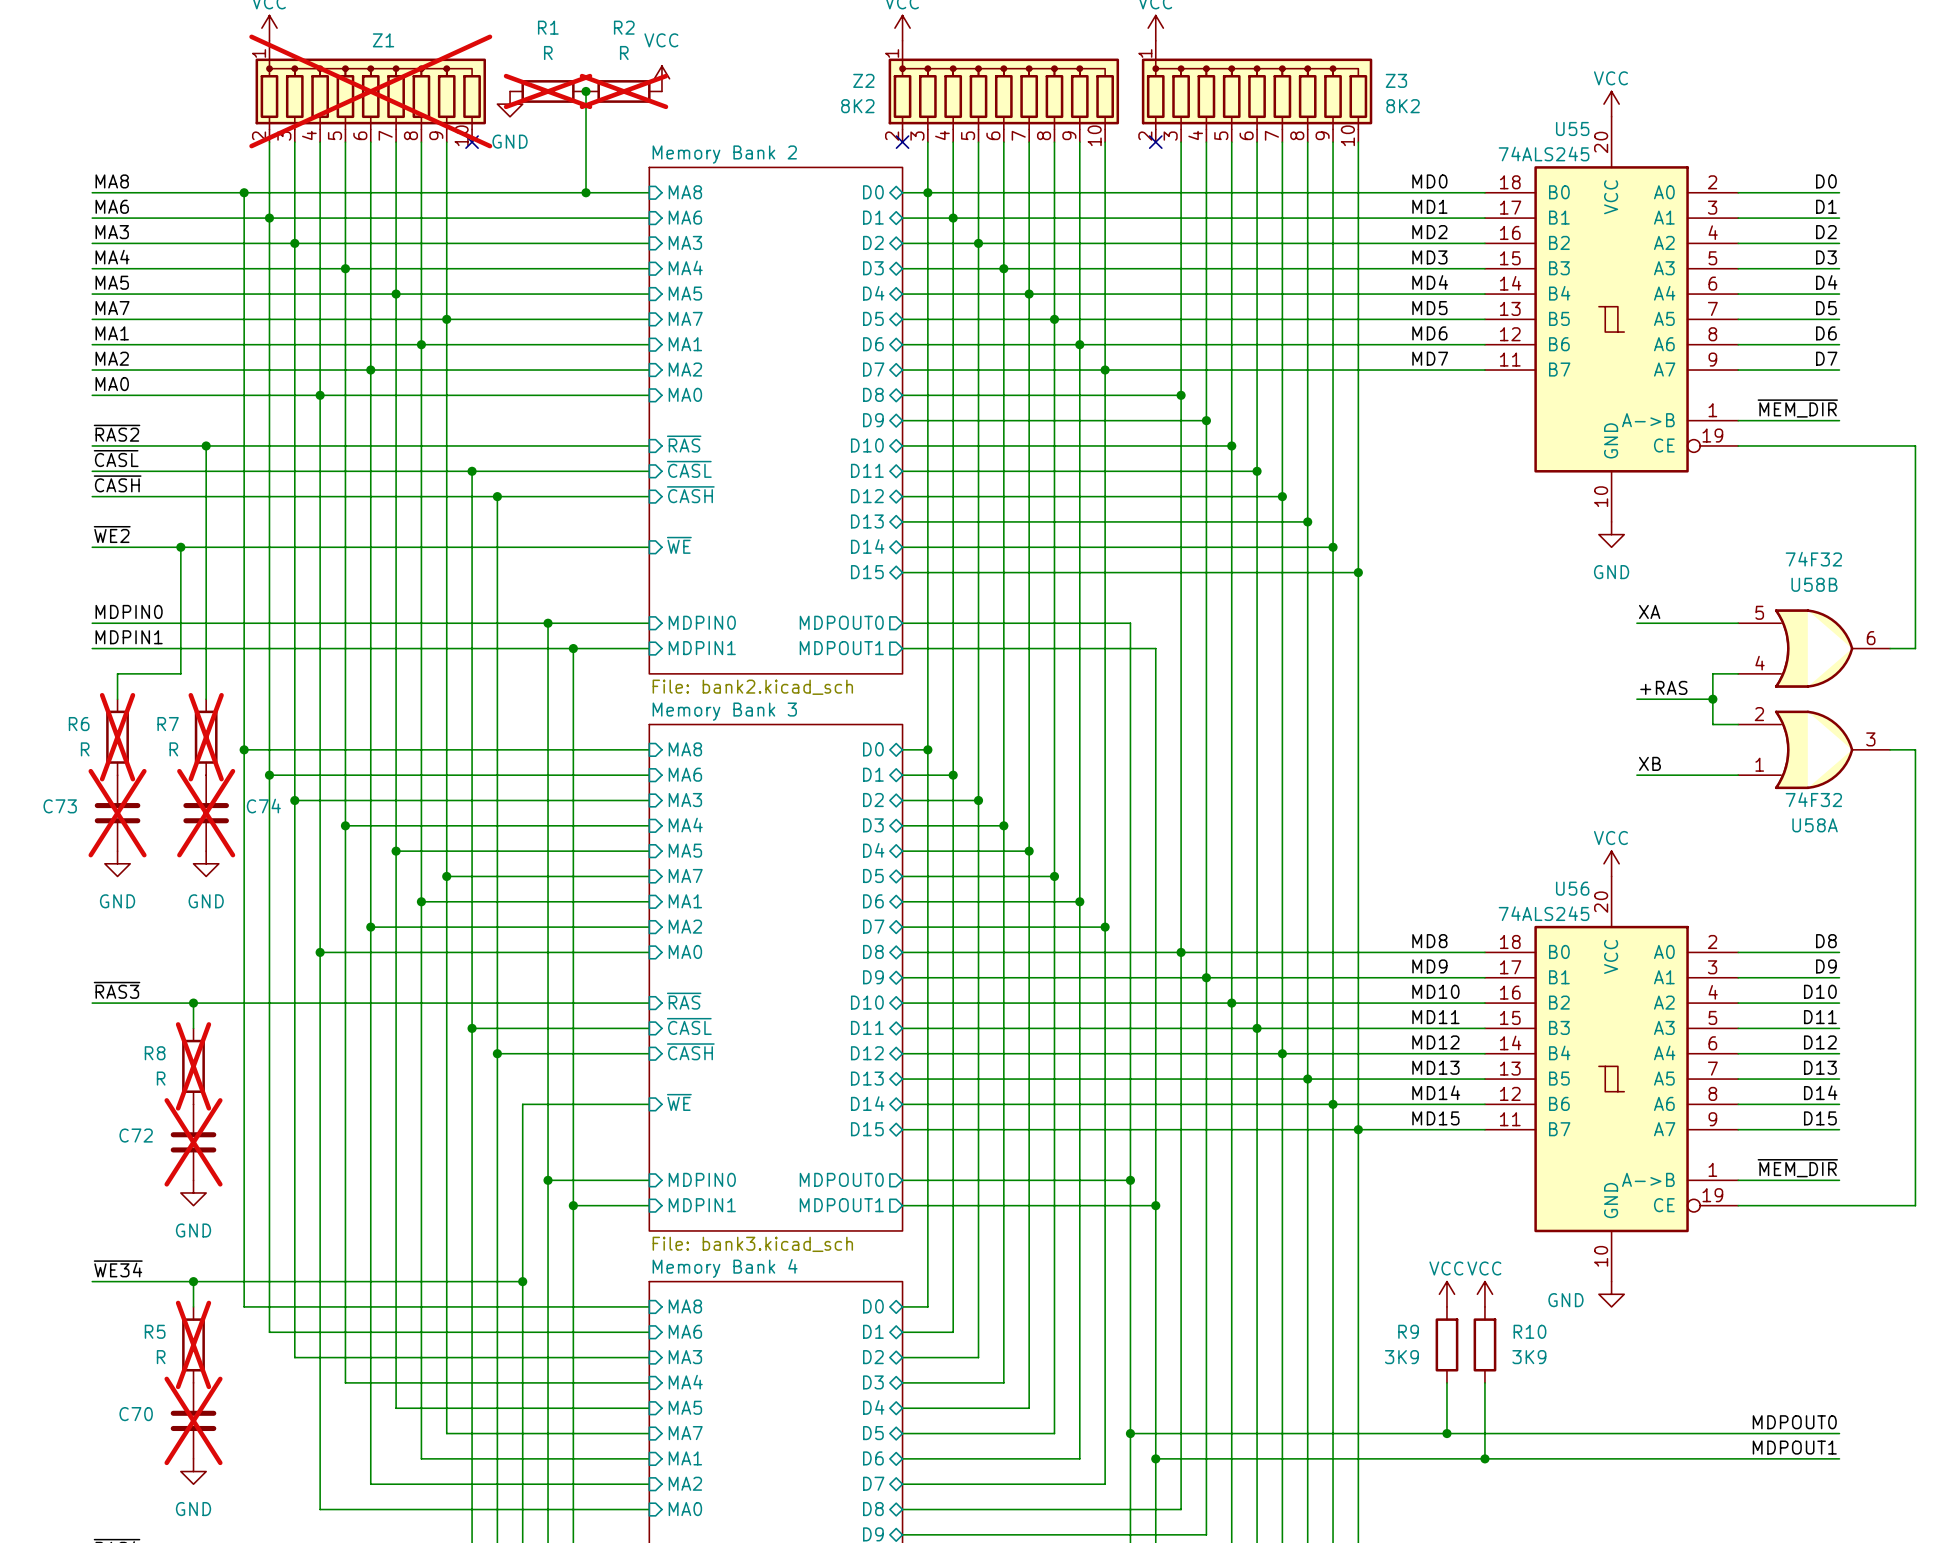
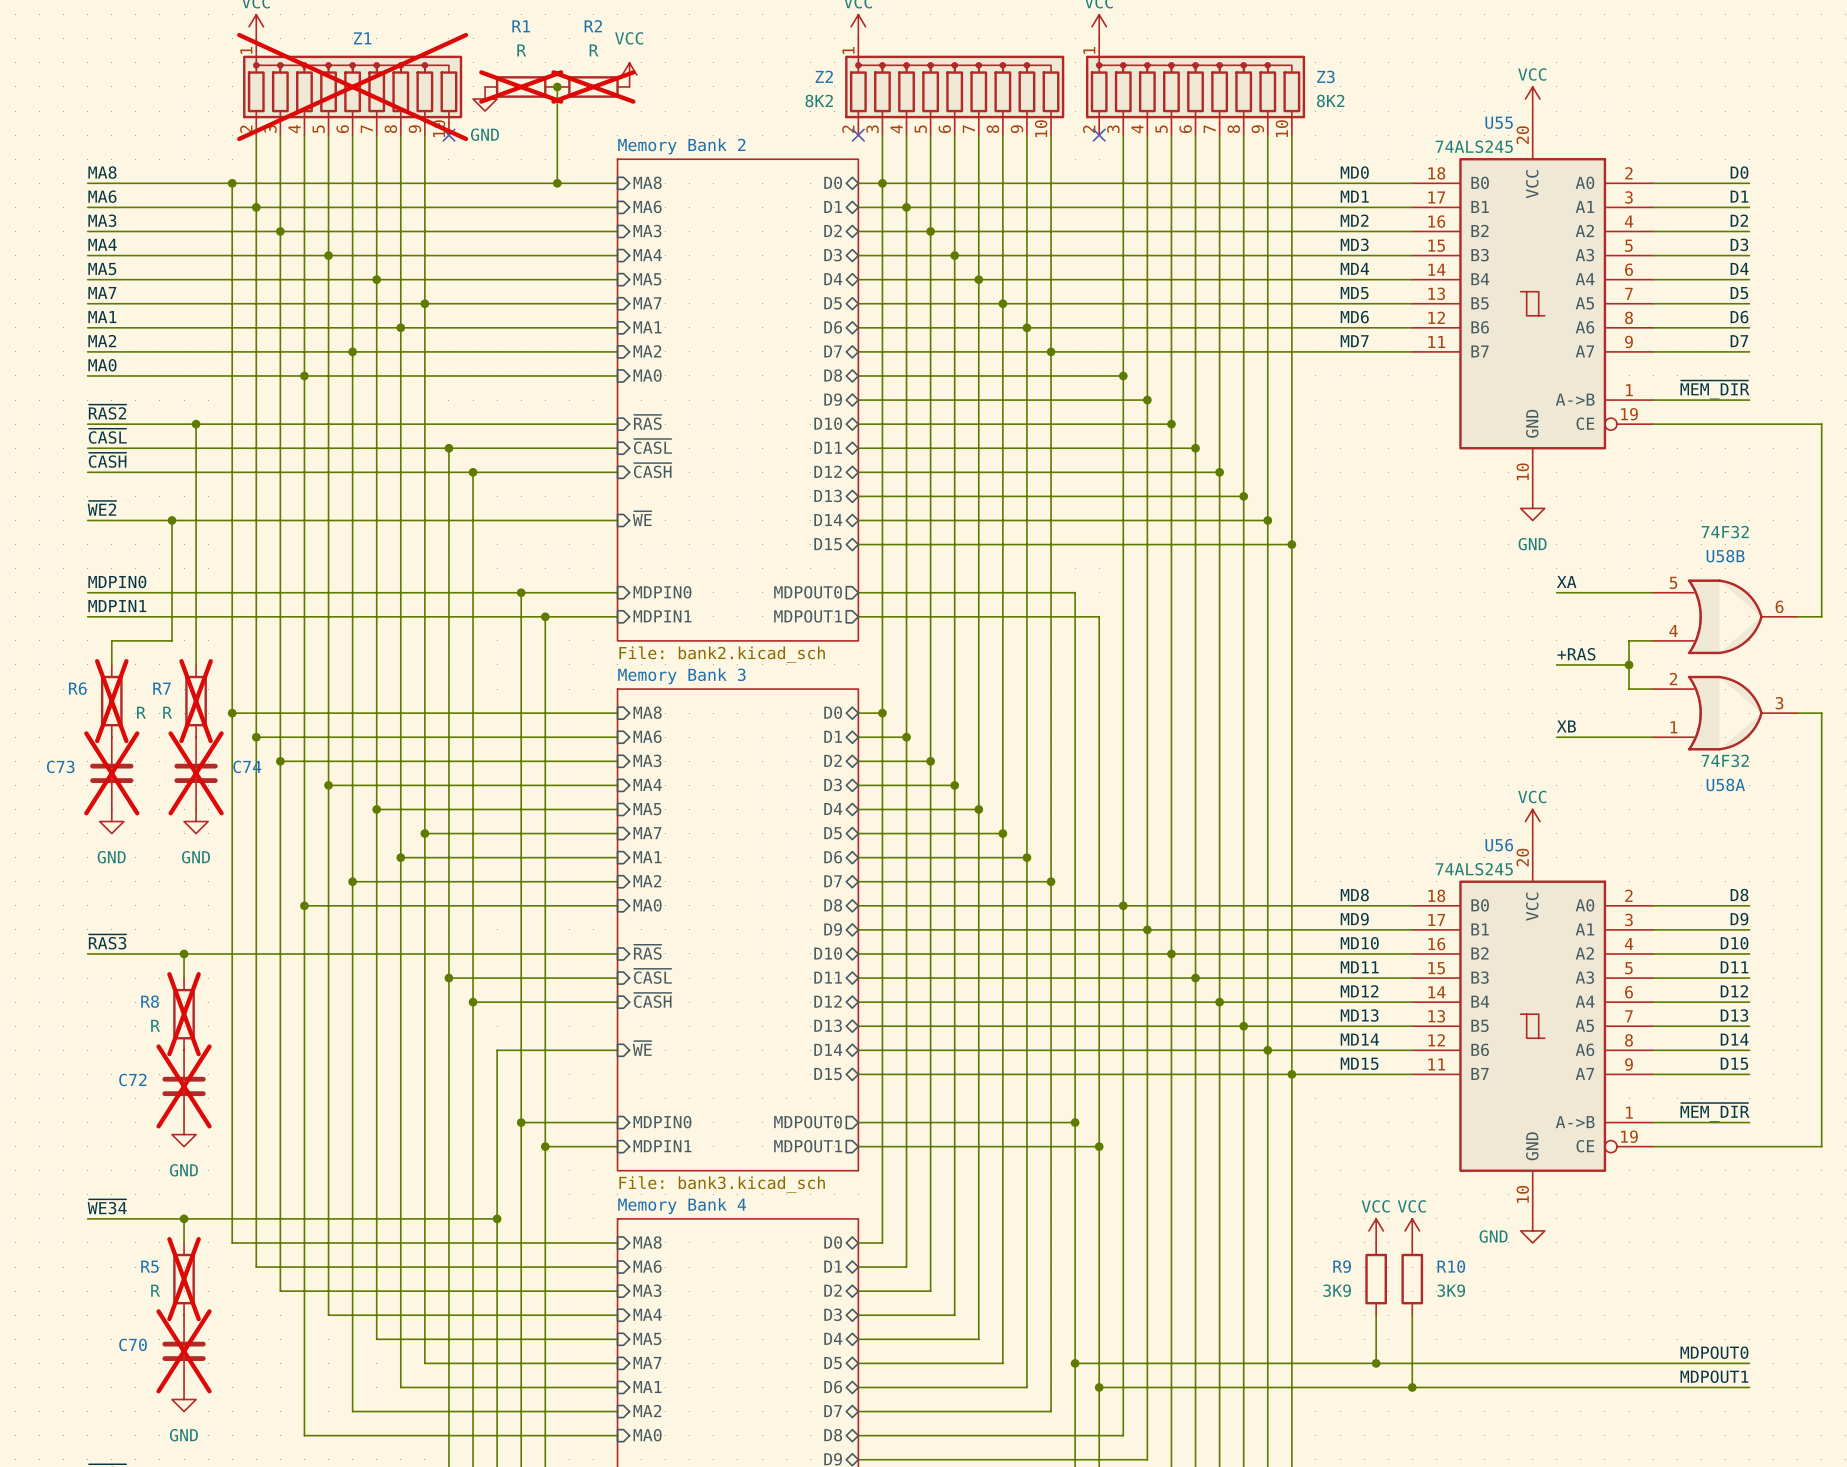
R6 value position: R (85, 749) -> R (141, 712)

